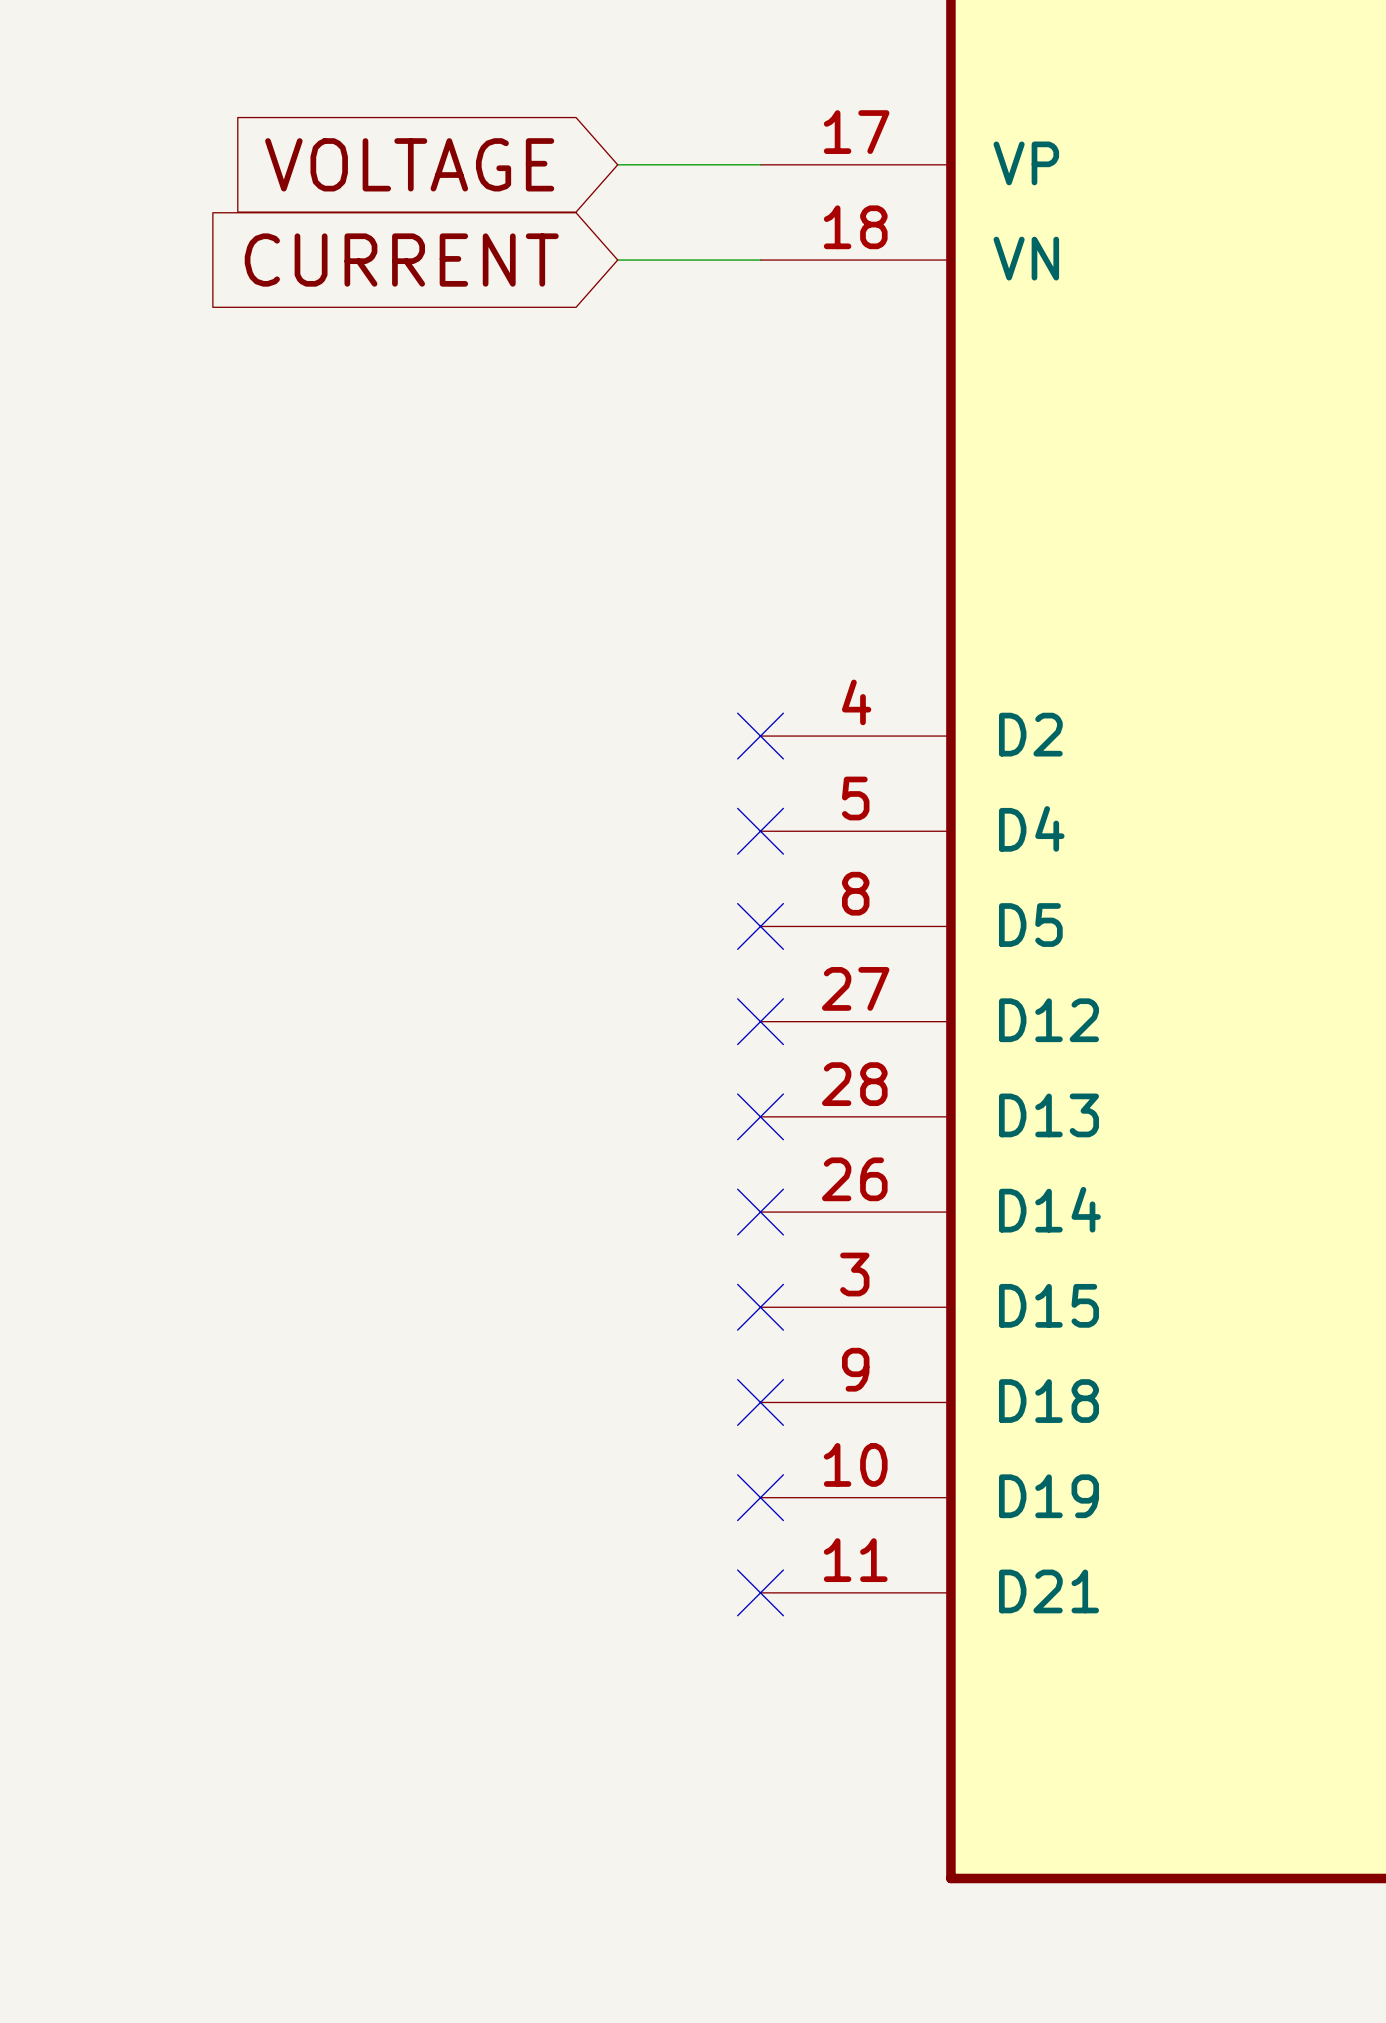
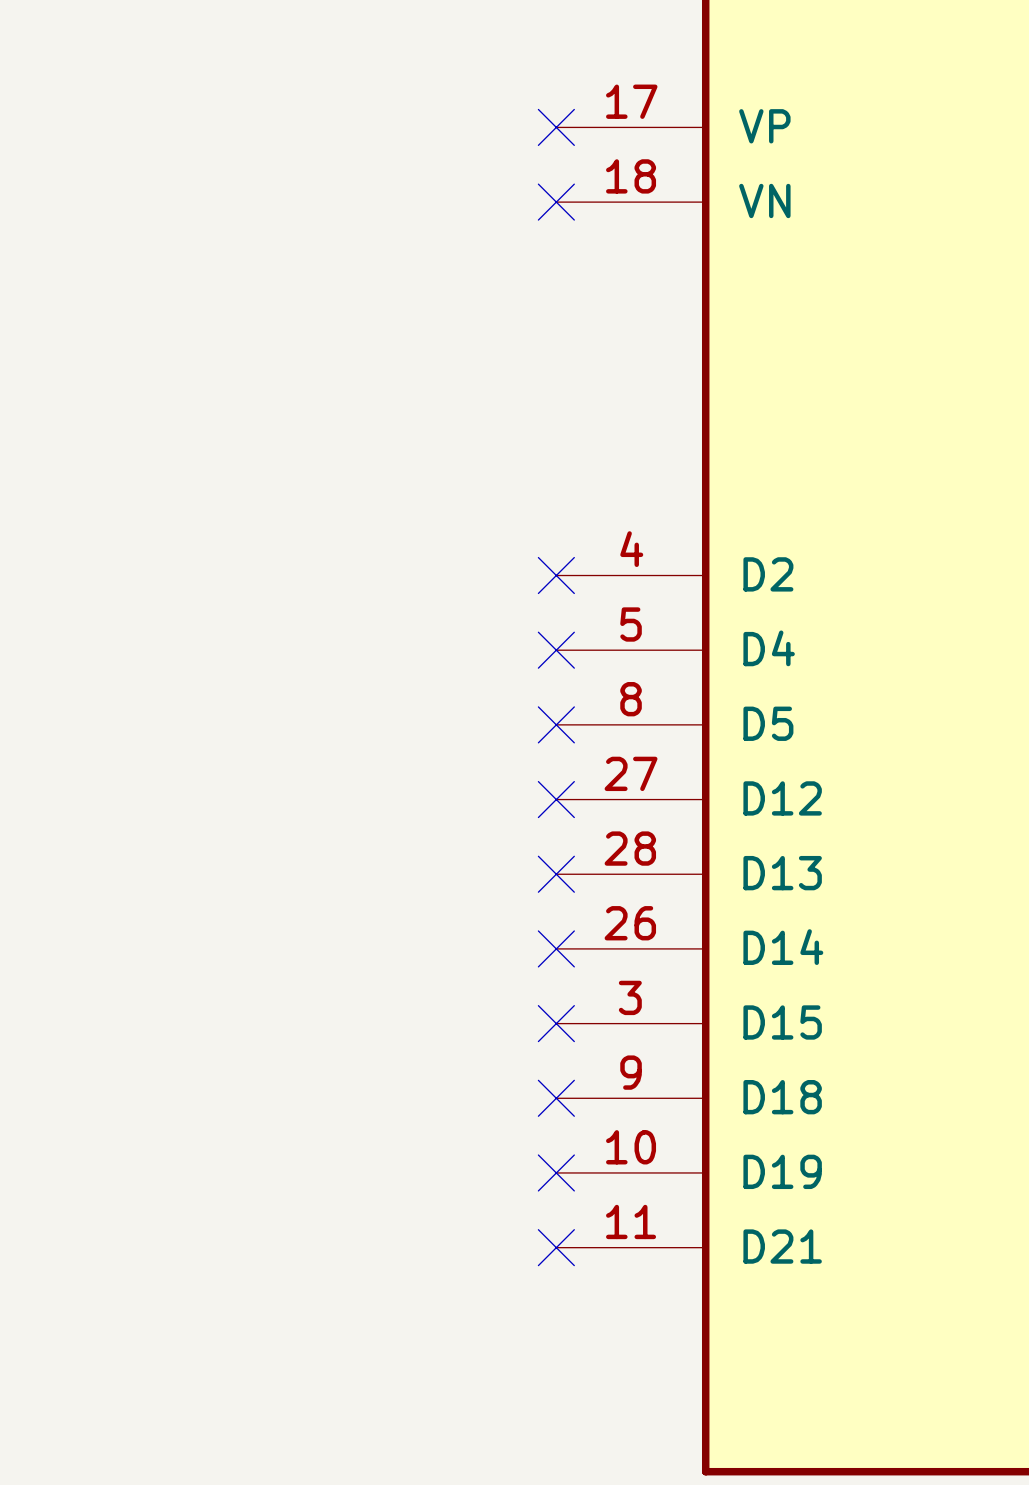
global label: VOLTAGE (409, 164) -> none
wire: (617, 164) (760, 164) -> none
no-connect mark: none -> (556, 127)
global label: CURRENT (401, 260) -> none
wire: (617, 260) (760, 260) -> none
no-connect mark: none -> (556, 202)

